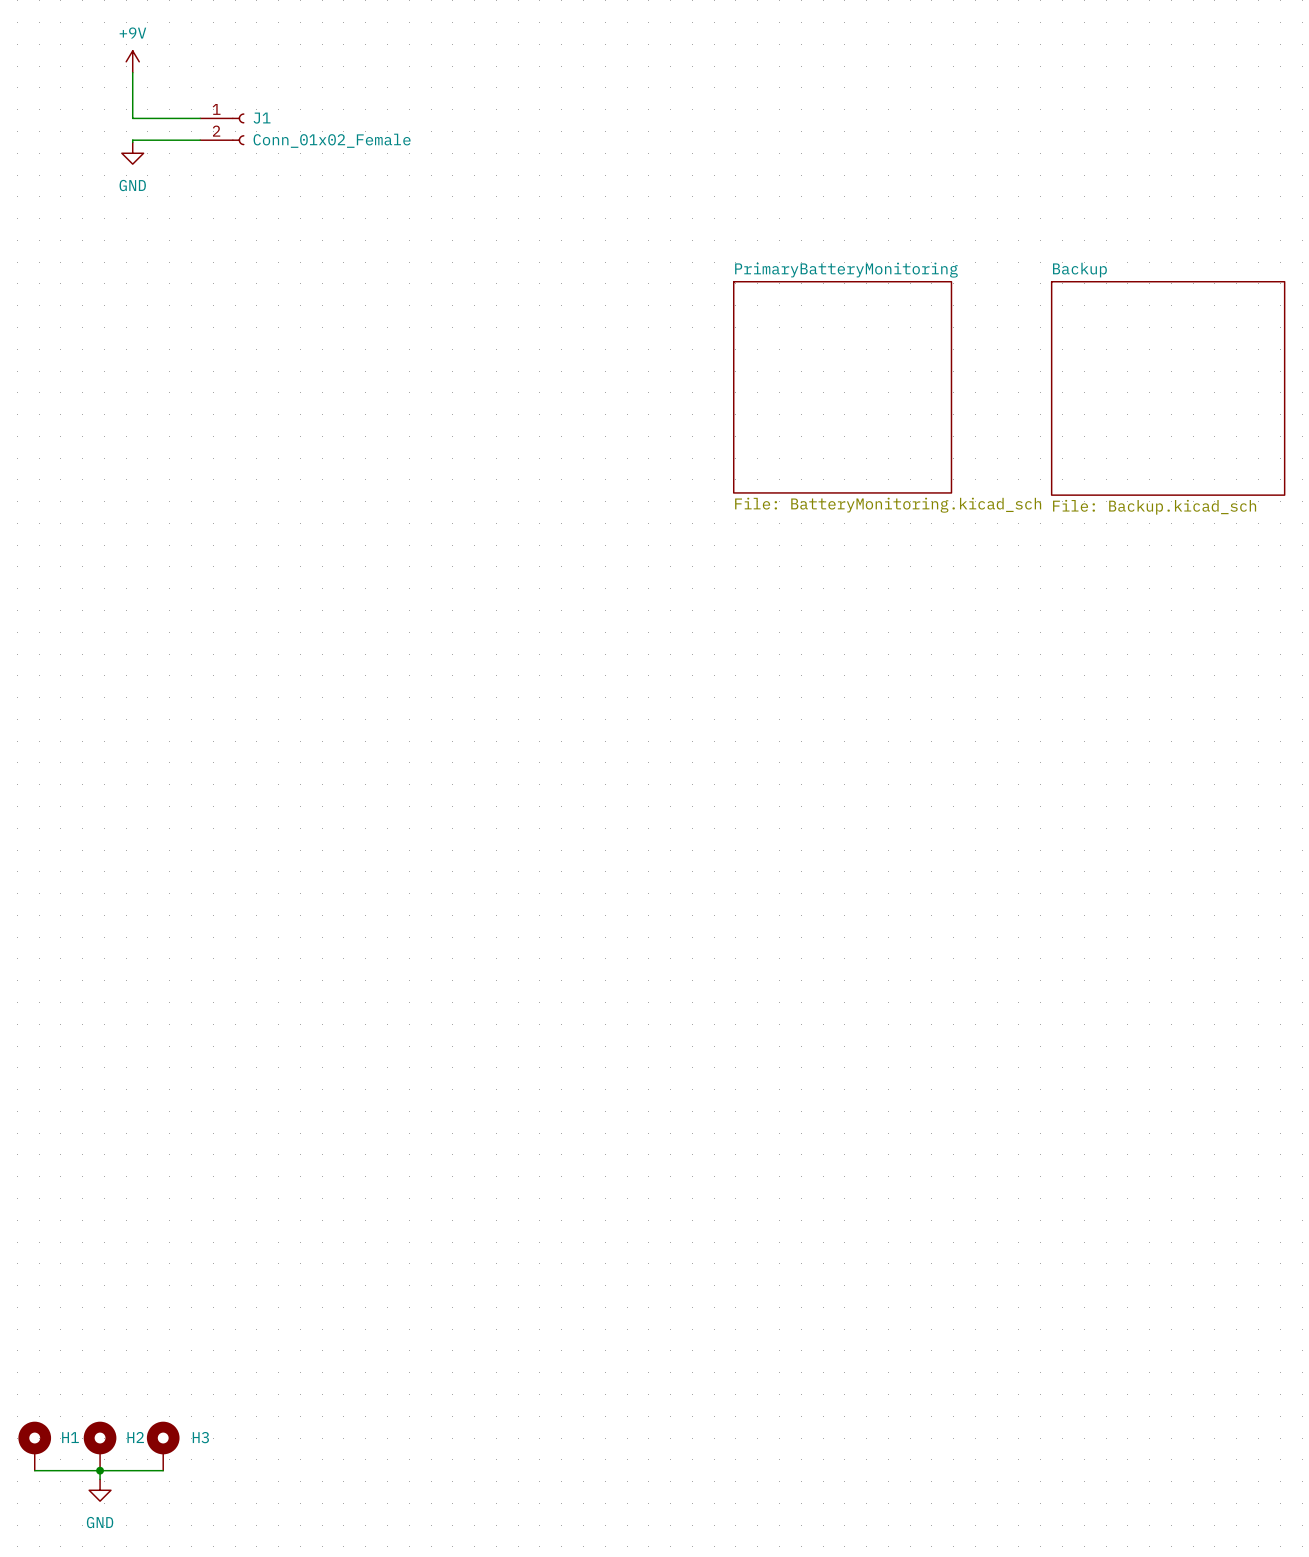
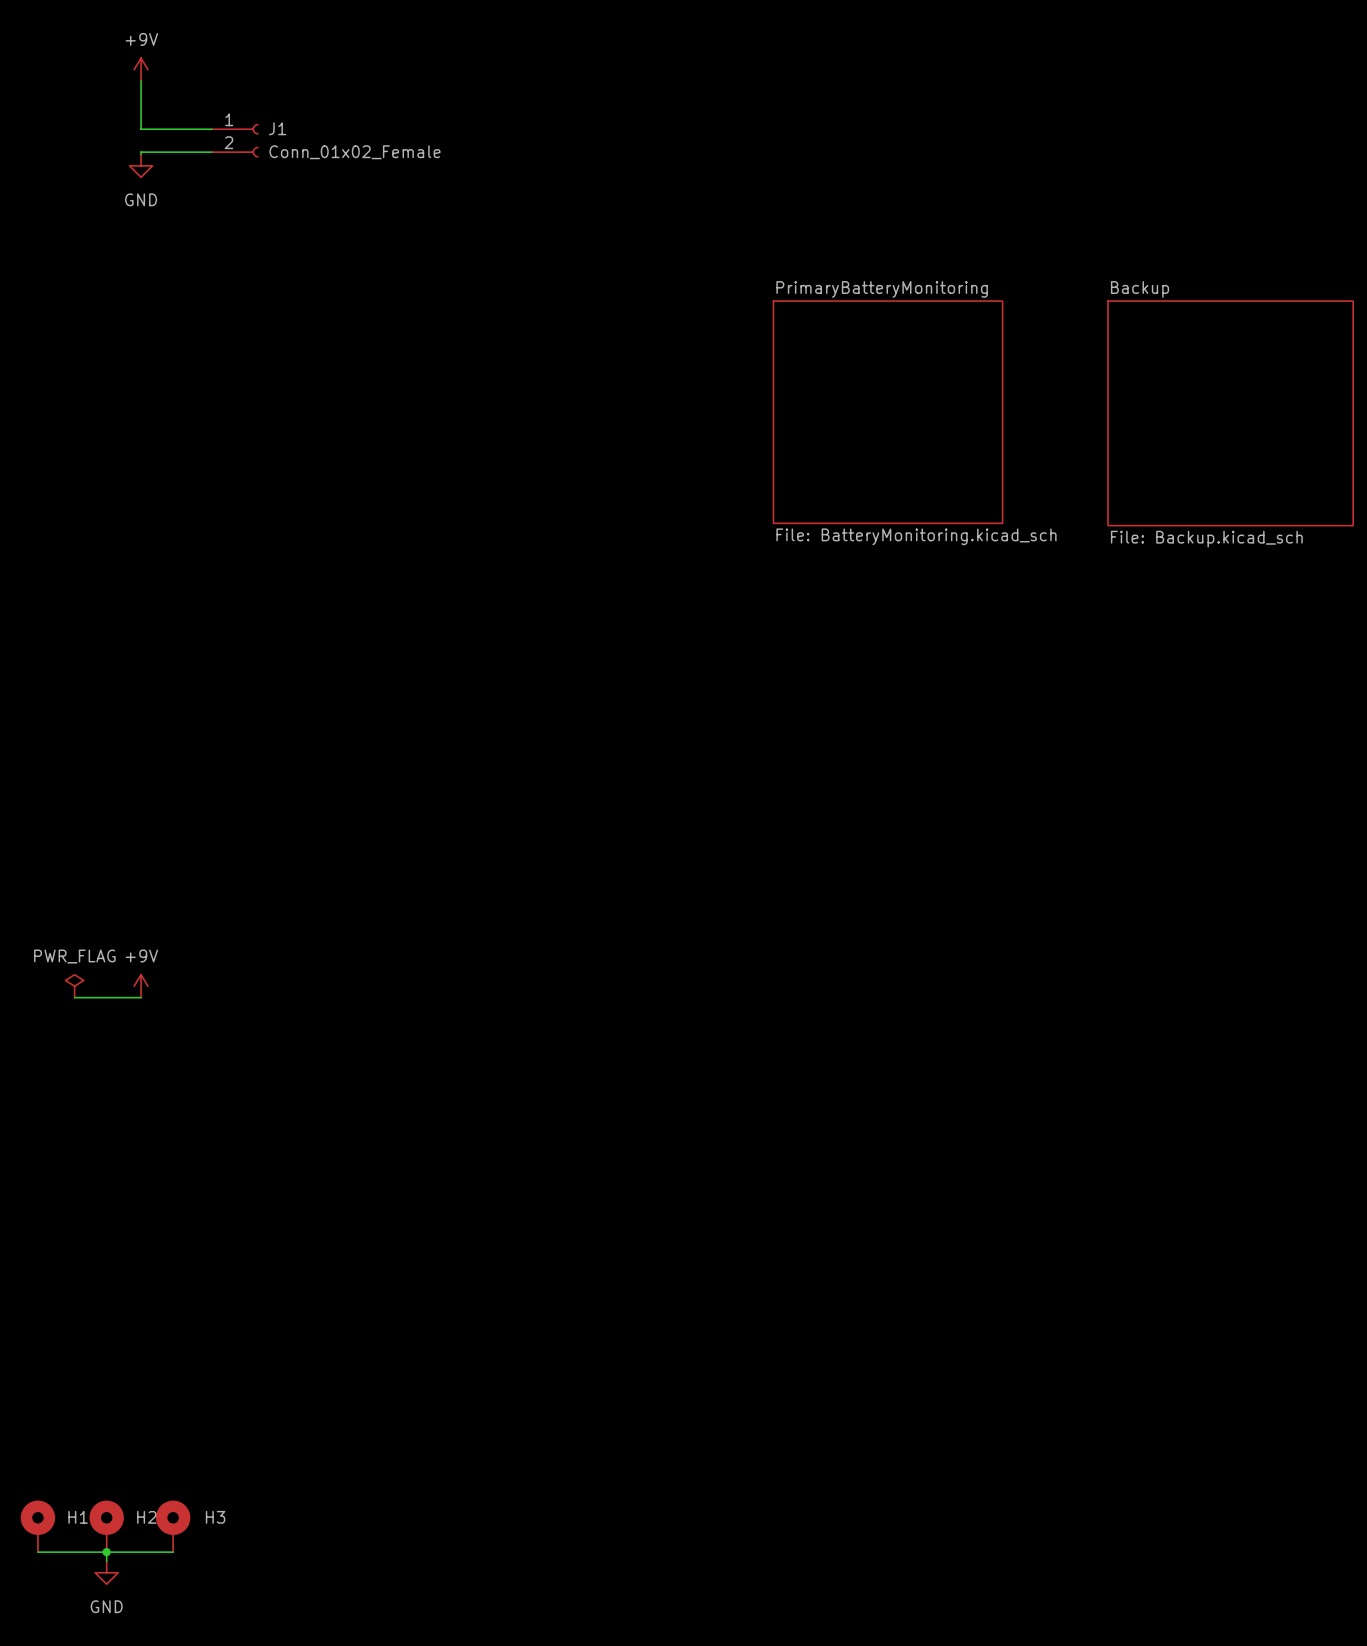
power symbol: none -> PWR_FLAG (74, 986)
power symbol: none -> +9V (141, 986)
wire: none -> (74, 997) (141, 997)

